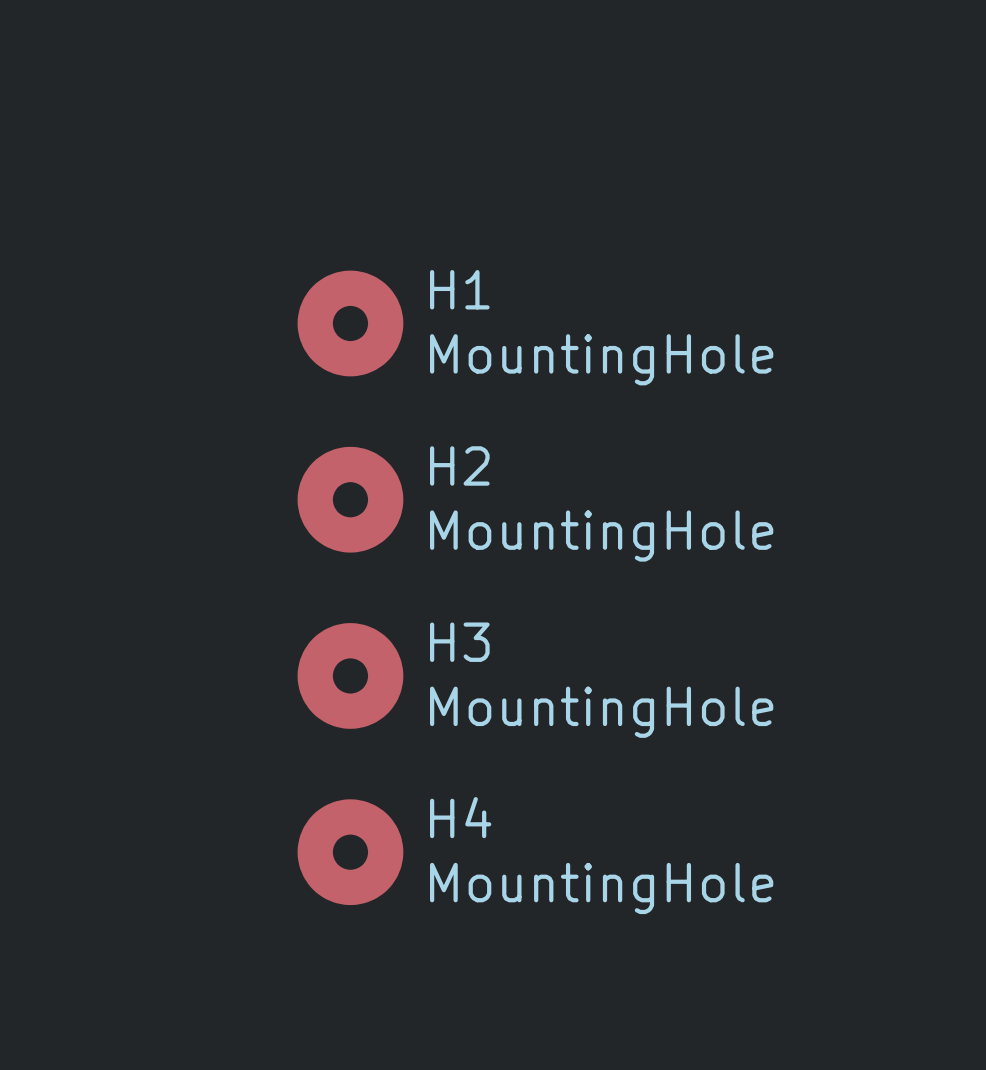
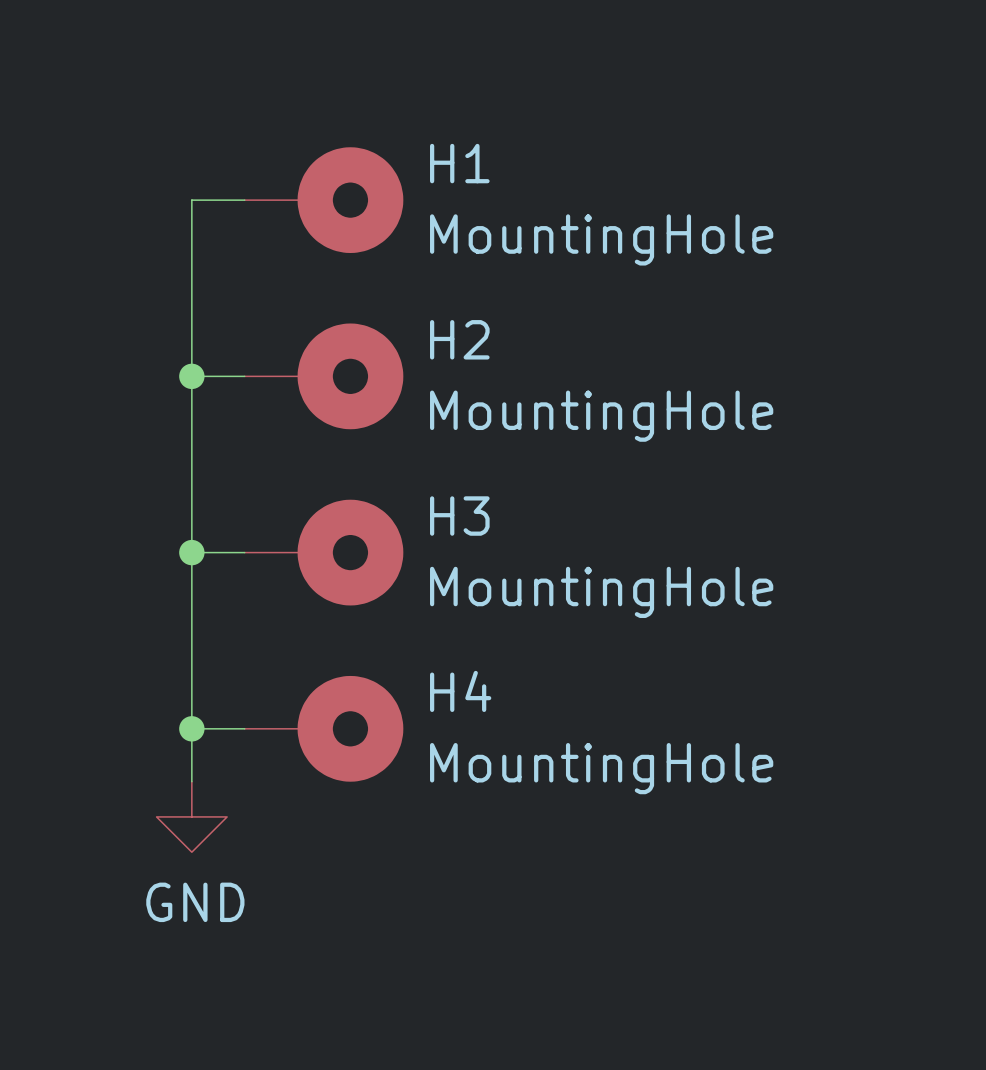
wire: none -> (244, 200) (191, 200) (191, 781)
H1 symbol: [297, 270, 404, 377] -> [244, 147, 404, 254]
wire: none -> (191, 376) (244, 376)
junction: none -> (191, 376)
H2 symbol: [297, 446, 404, 553] -> [244, 323, 404, 430]
wire: none -> (191, 552) (244, 552)
junction: none -> (191, 552)
H3 symbol: [297, 623, 404, 729] -> [244, 499, 404, 606]
wire: none -> (191, 728) (244, 728)
junction: none -> (191, 728)
H4 symbol: [297, 799, 404, 906] -> [244, 675, 404, 782]
power symbol: none -> GND (191, 816)

